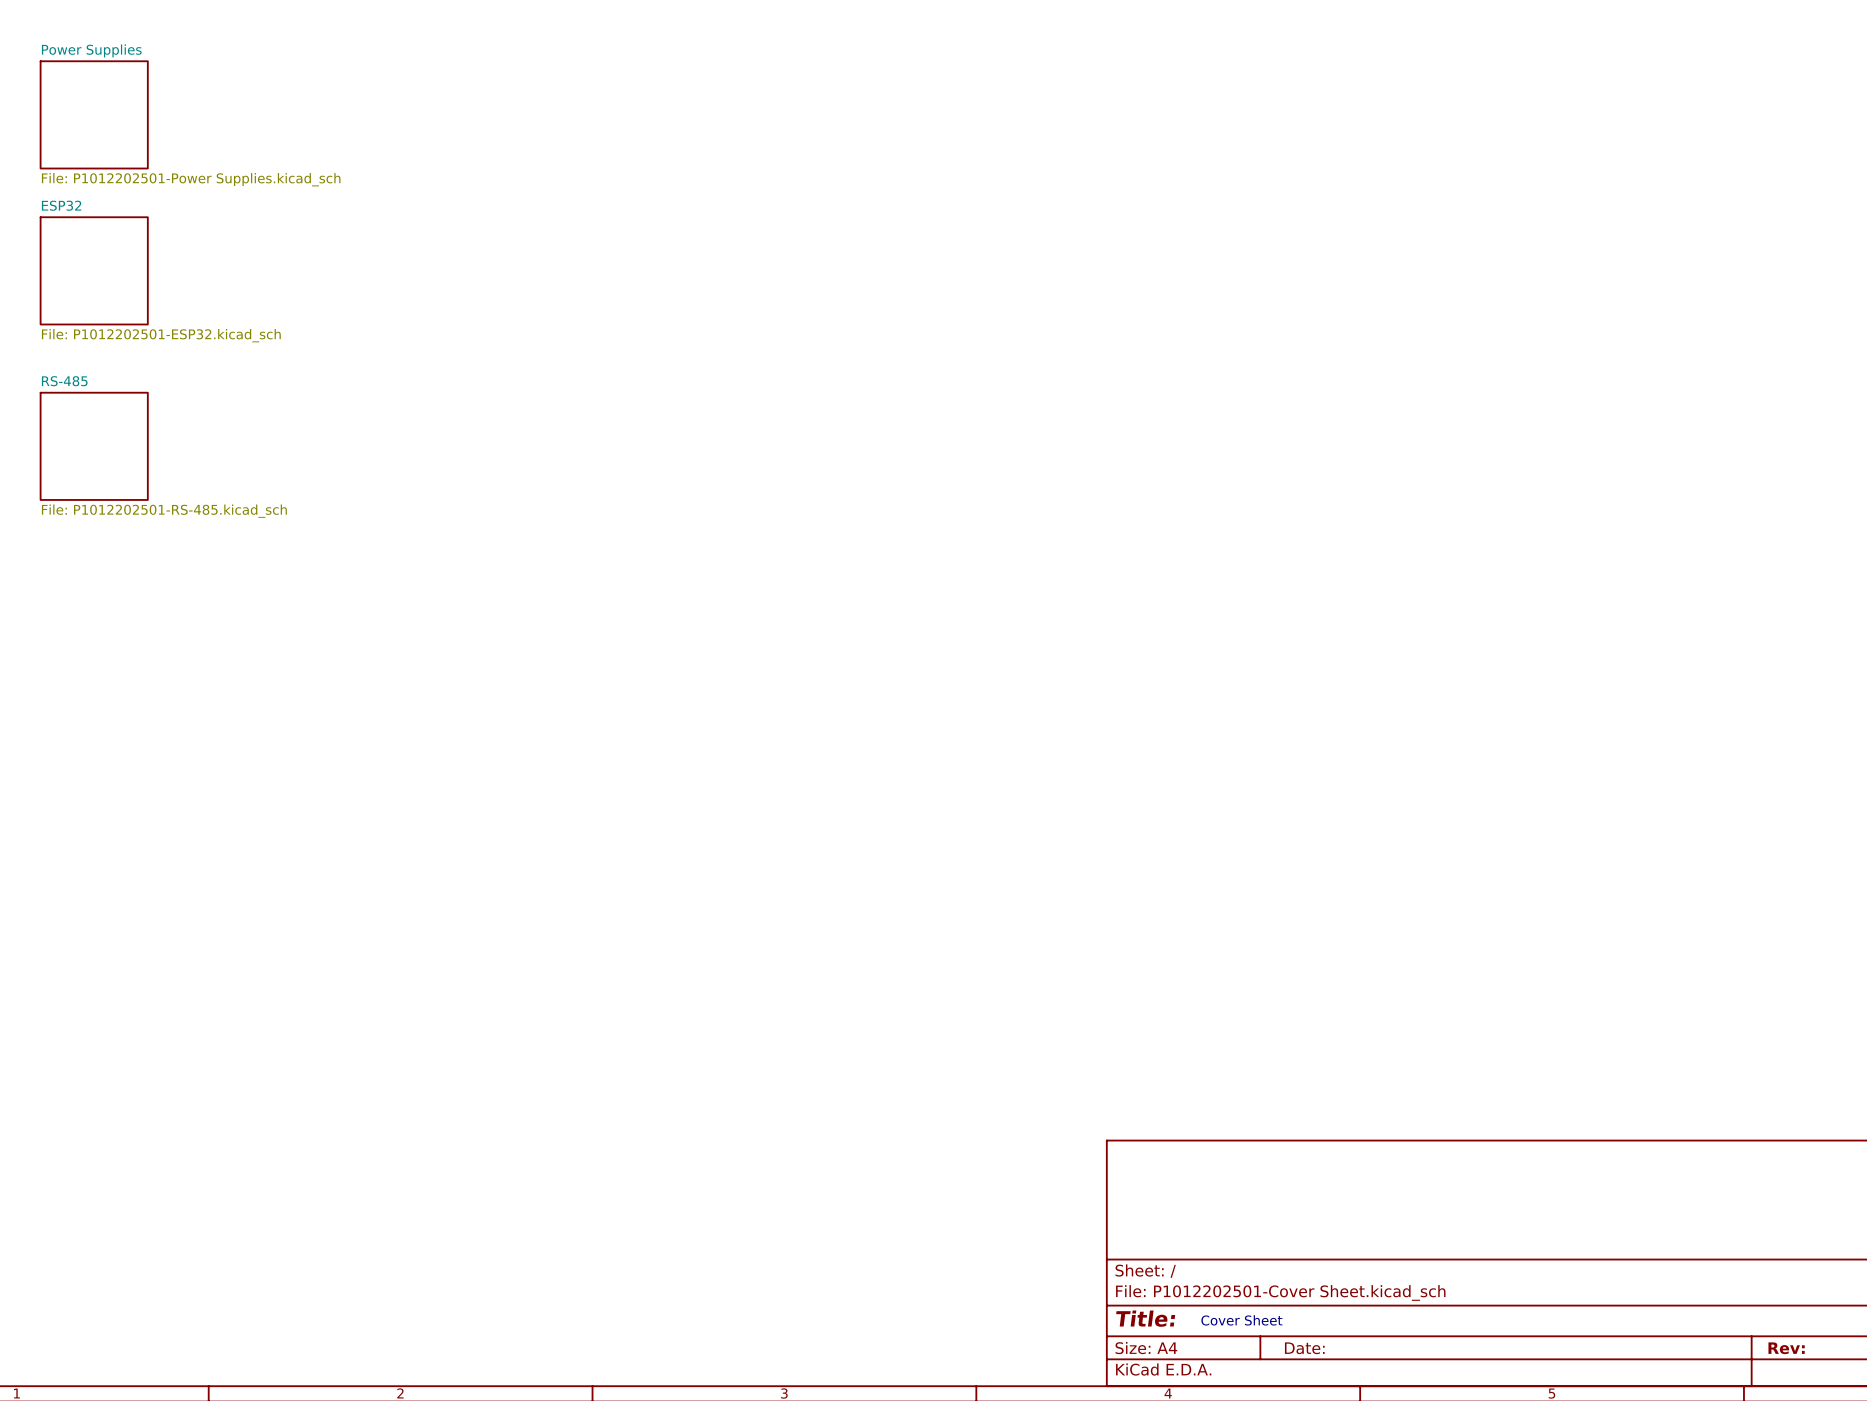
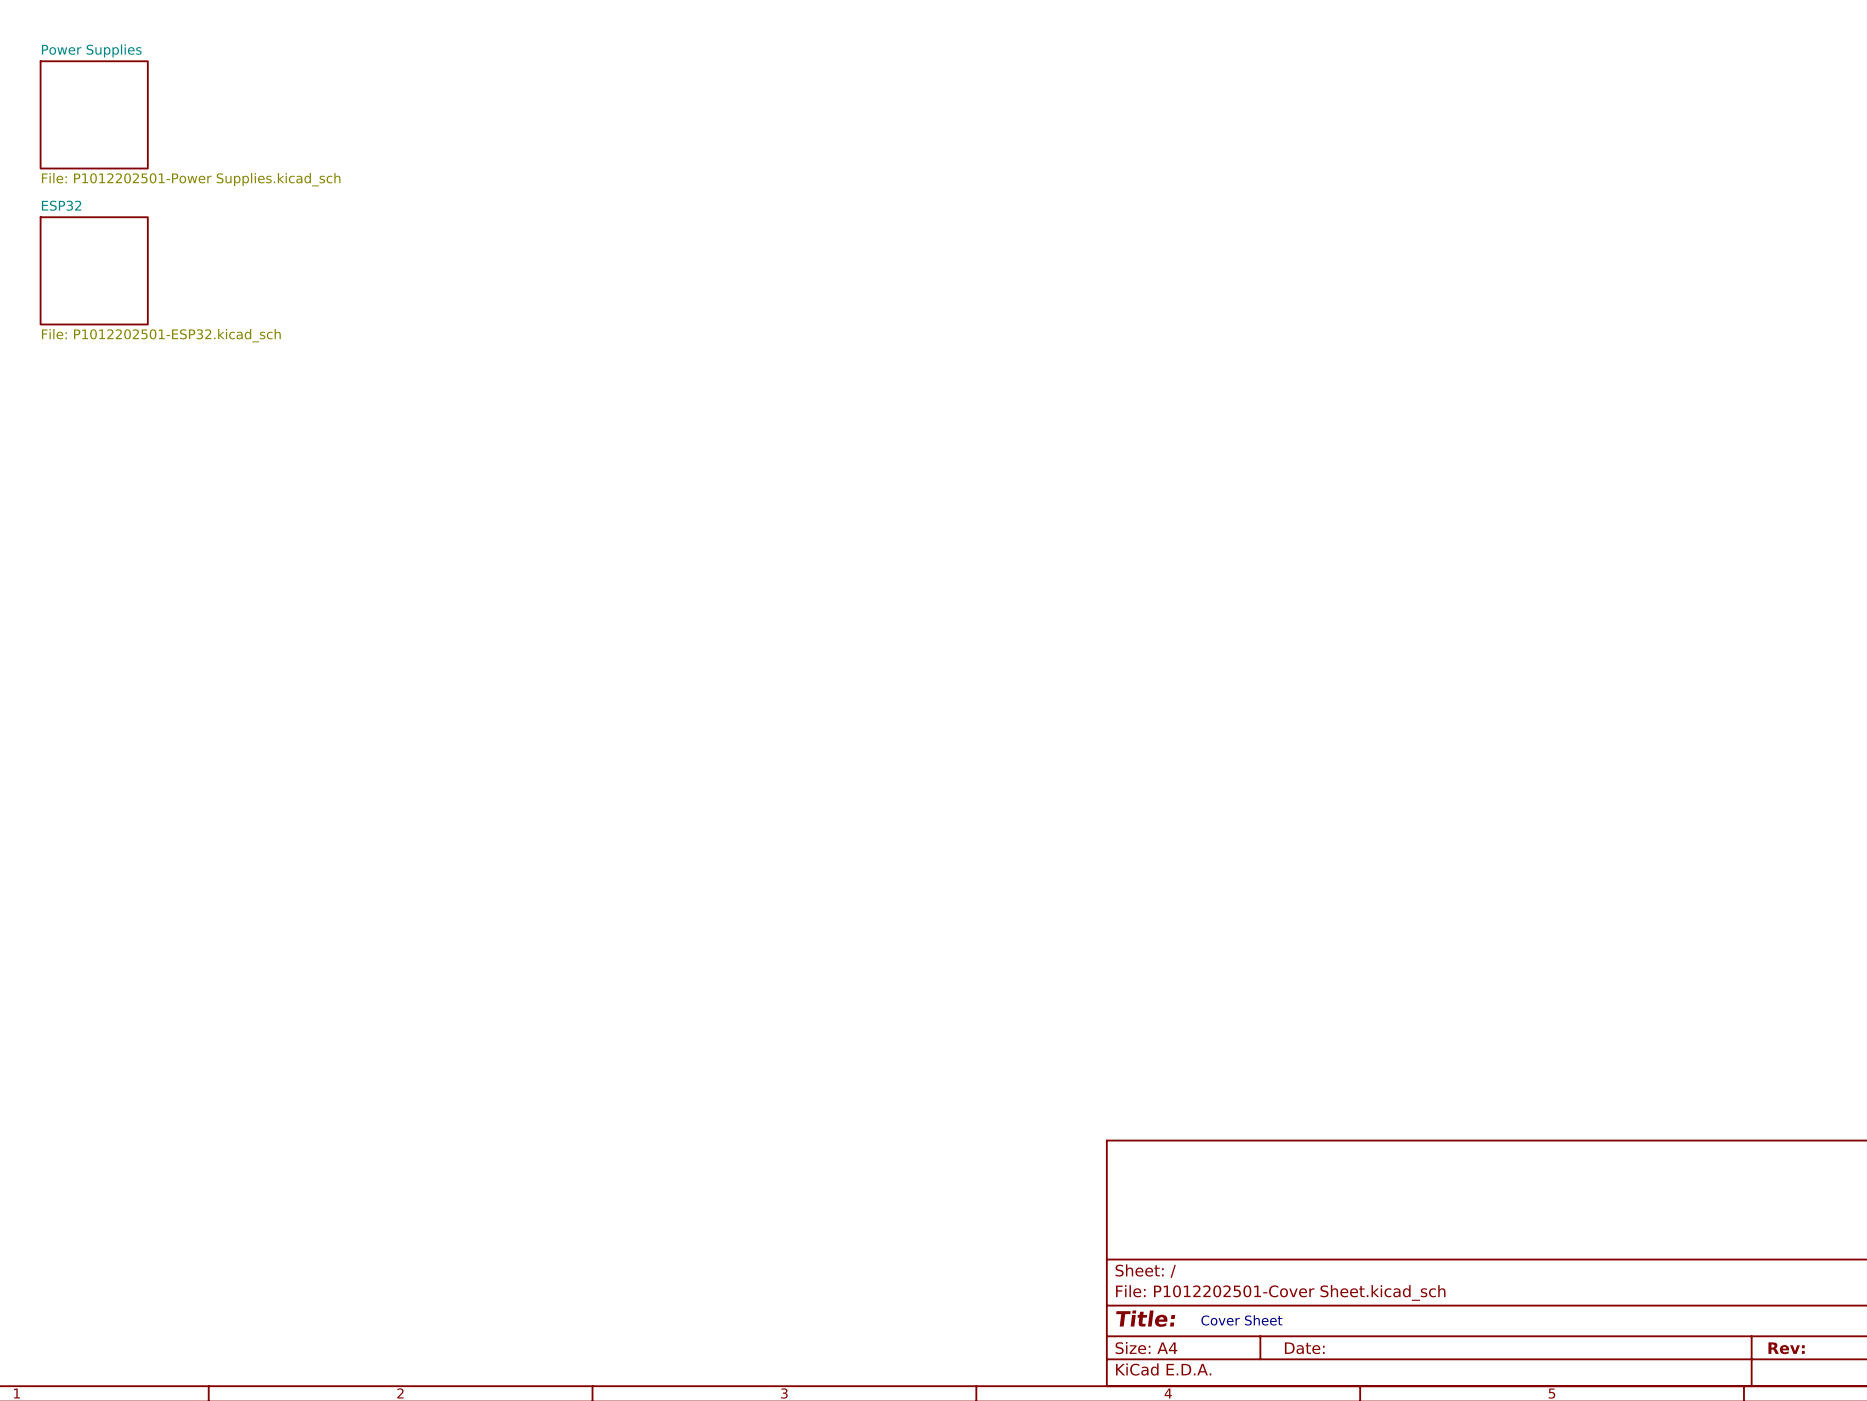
sheet RS-485: File: P1012202501-RS-485.kicad_sch (94, 446) -> none

